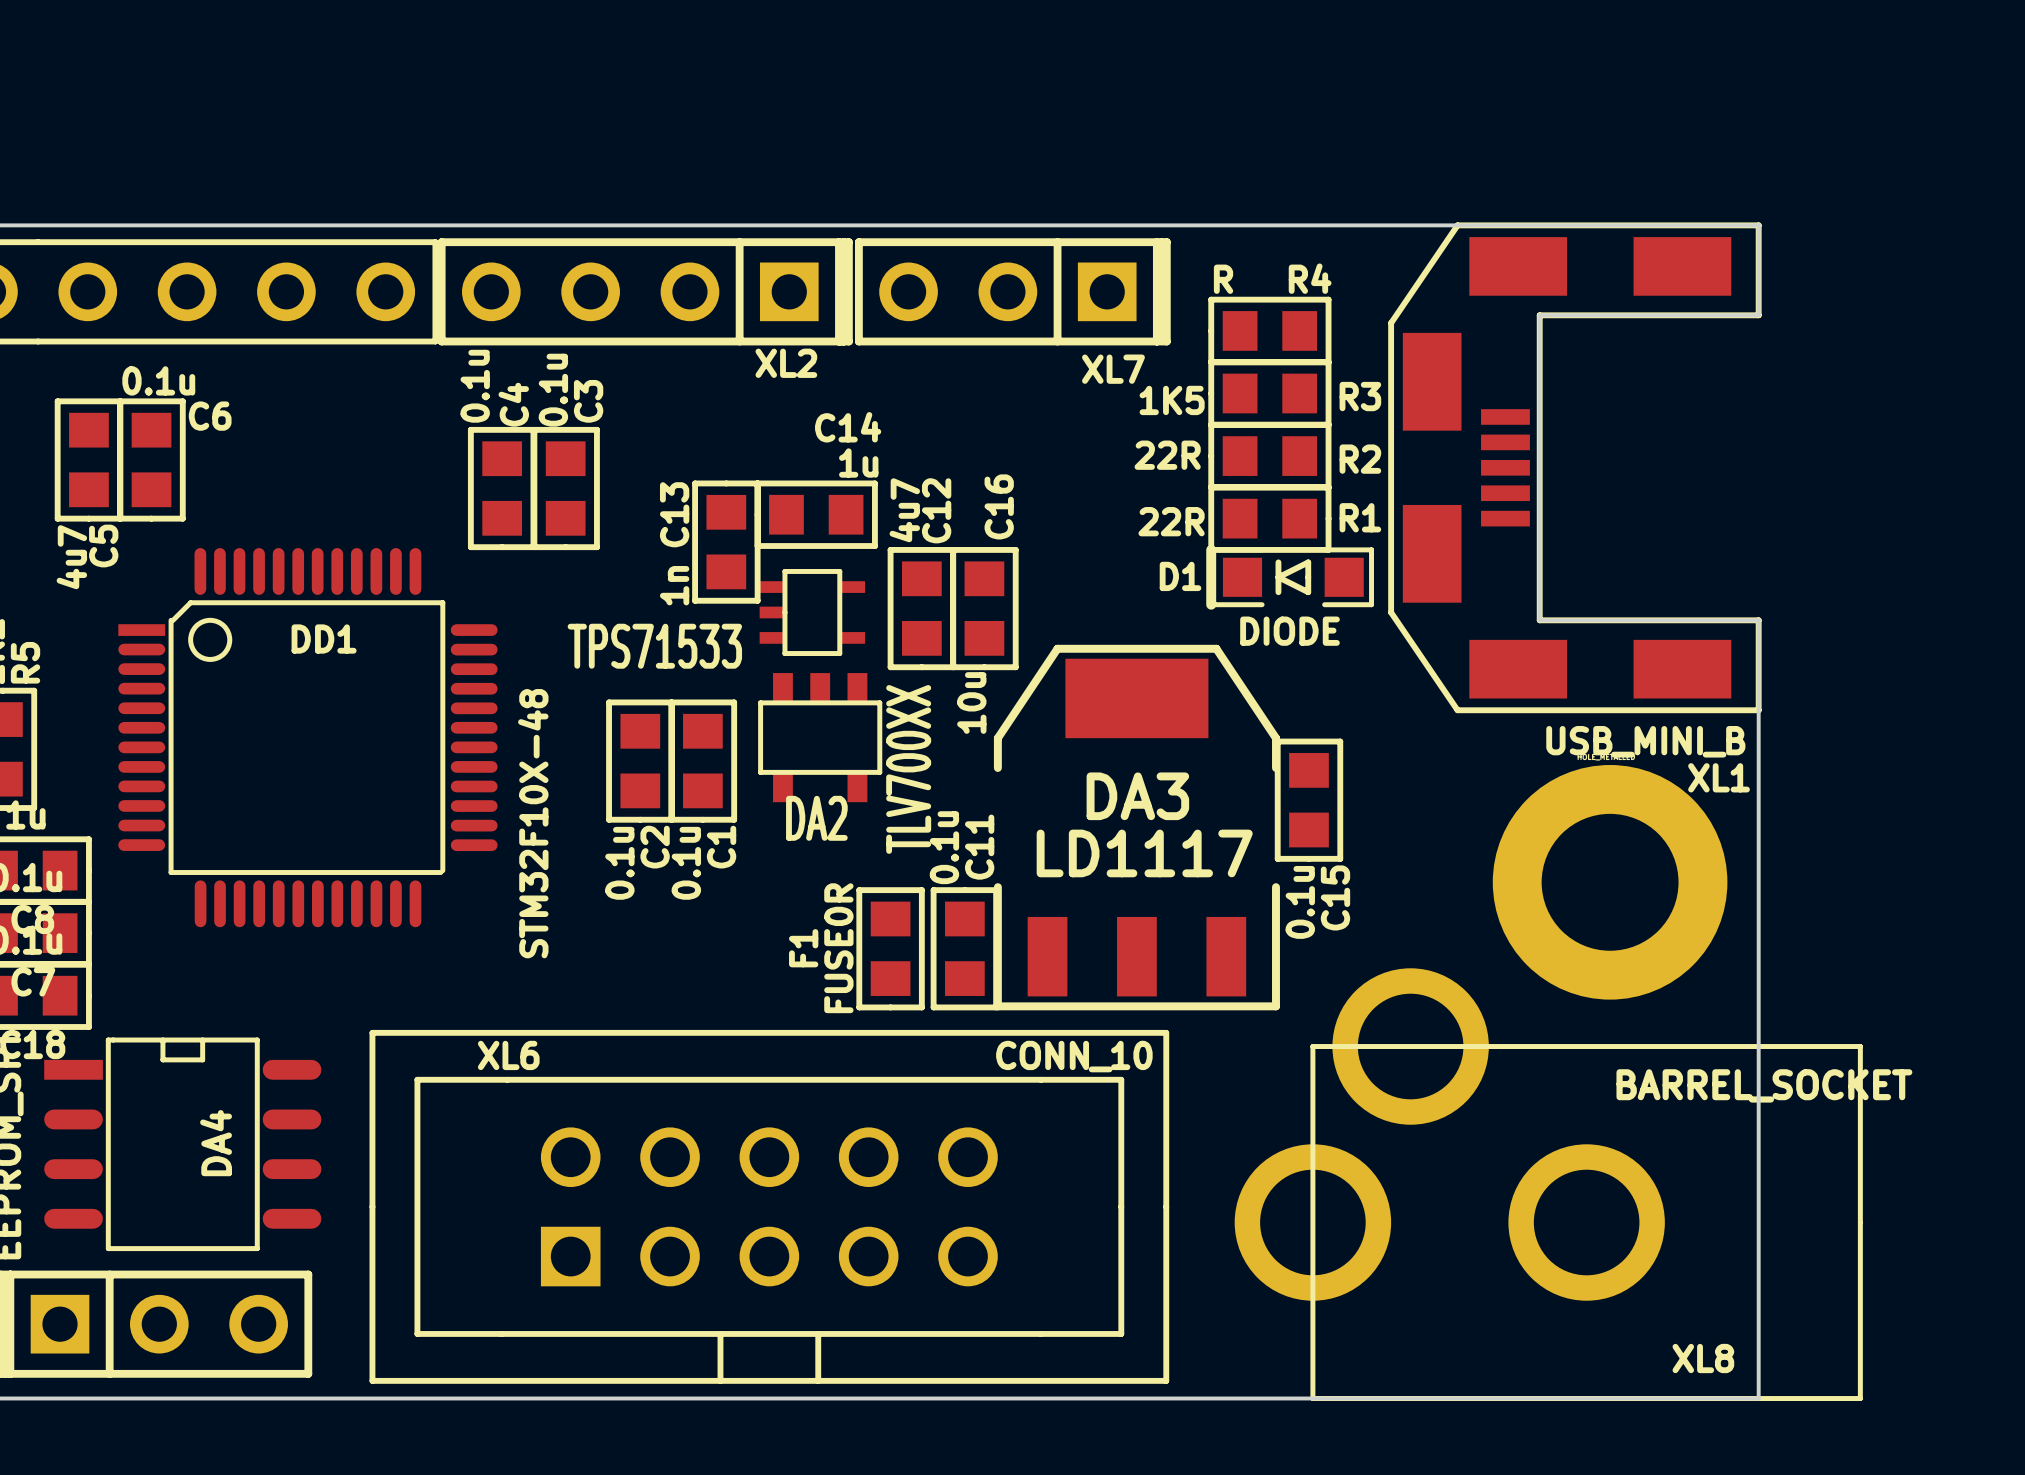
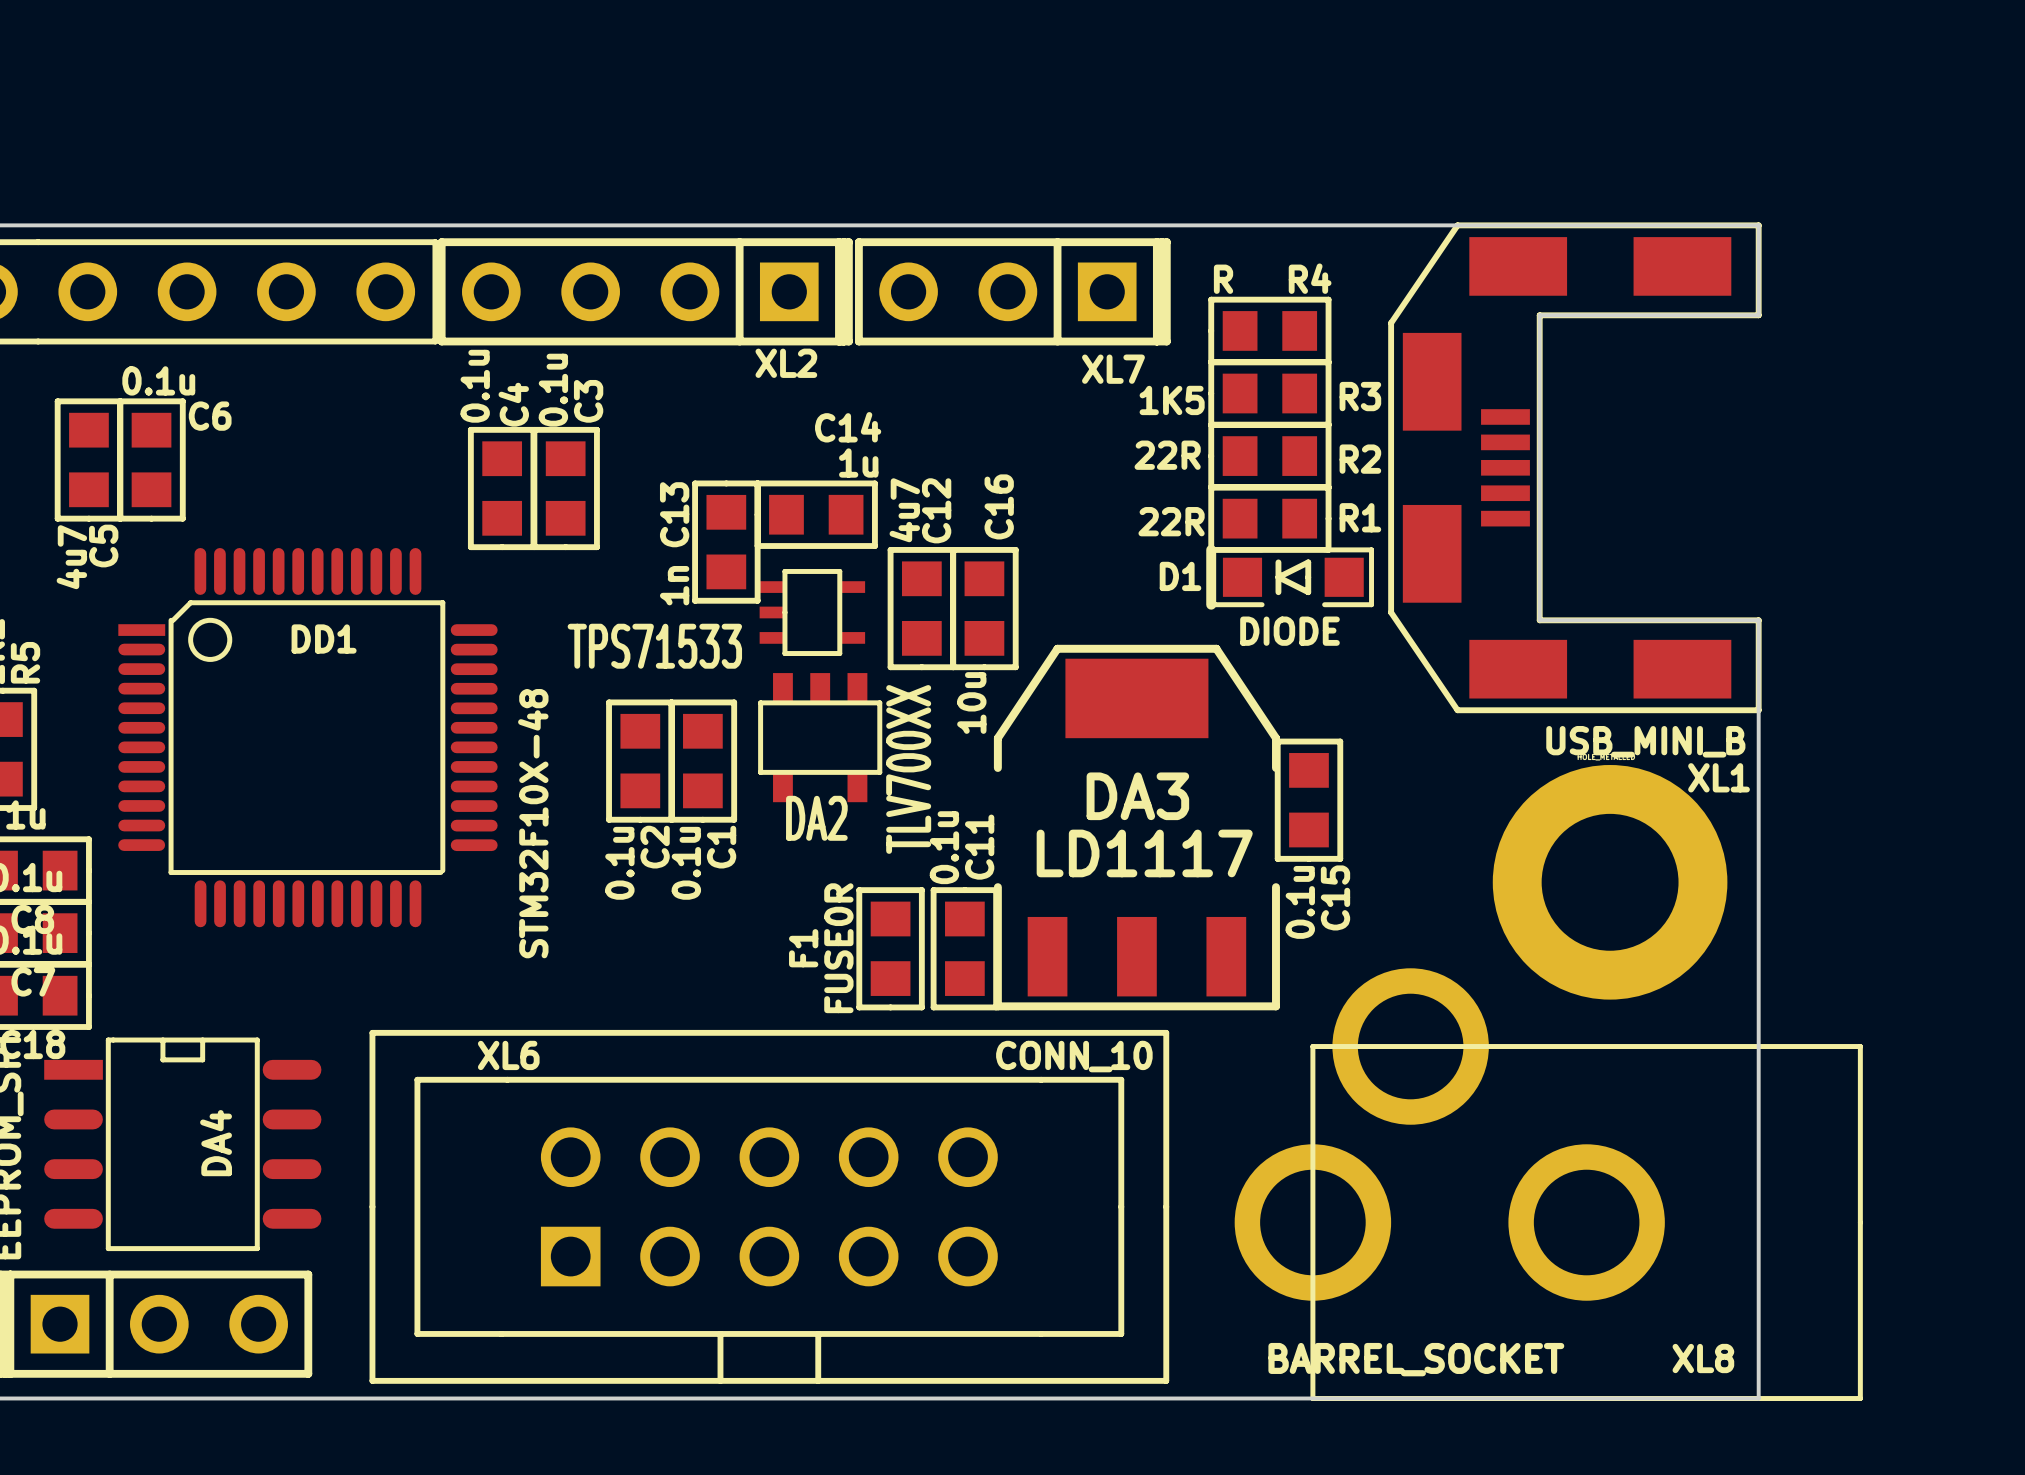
XL8 value position: BARREL_SOCKET (1764, 1085) -> BARREL_SOCKET (1416, 1359)

